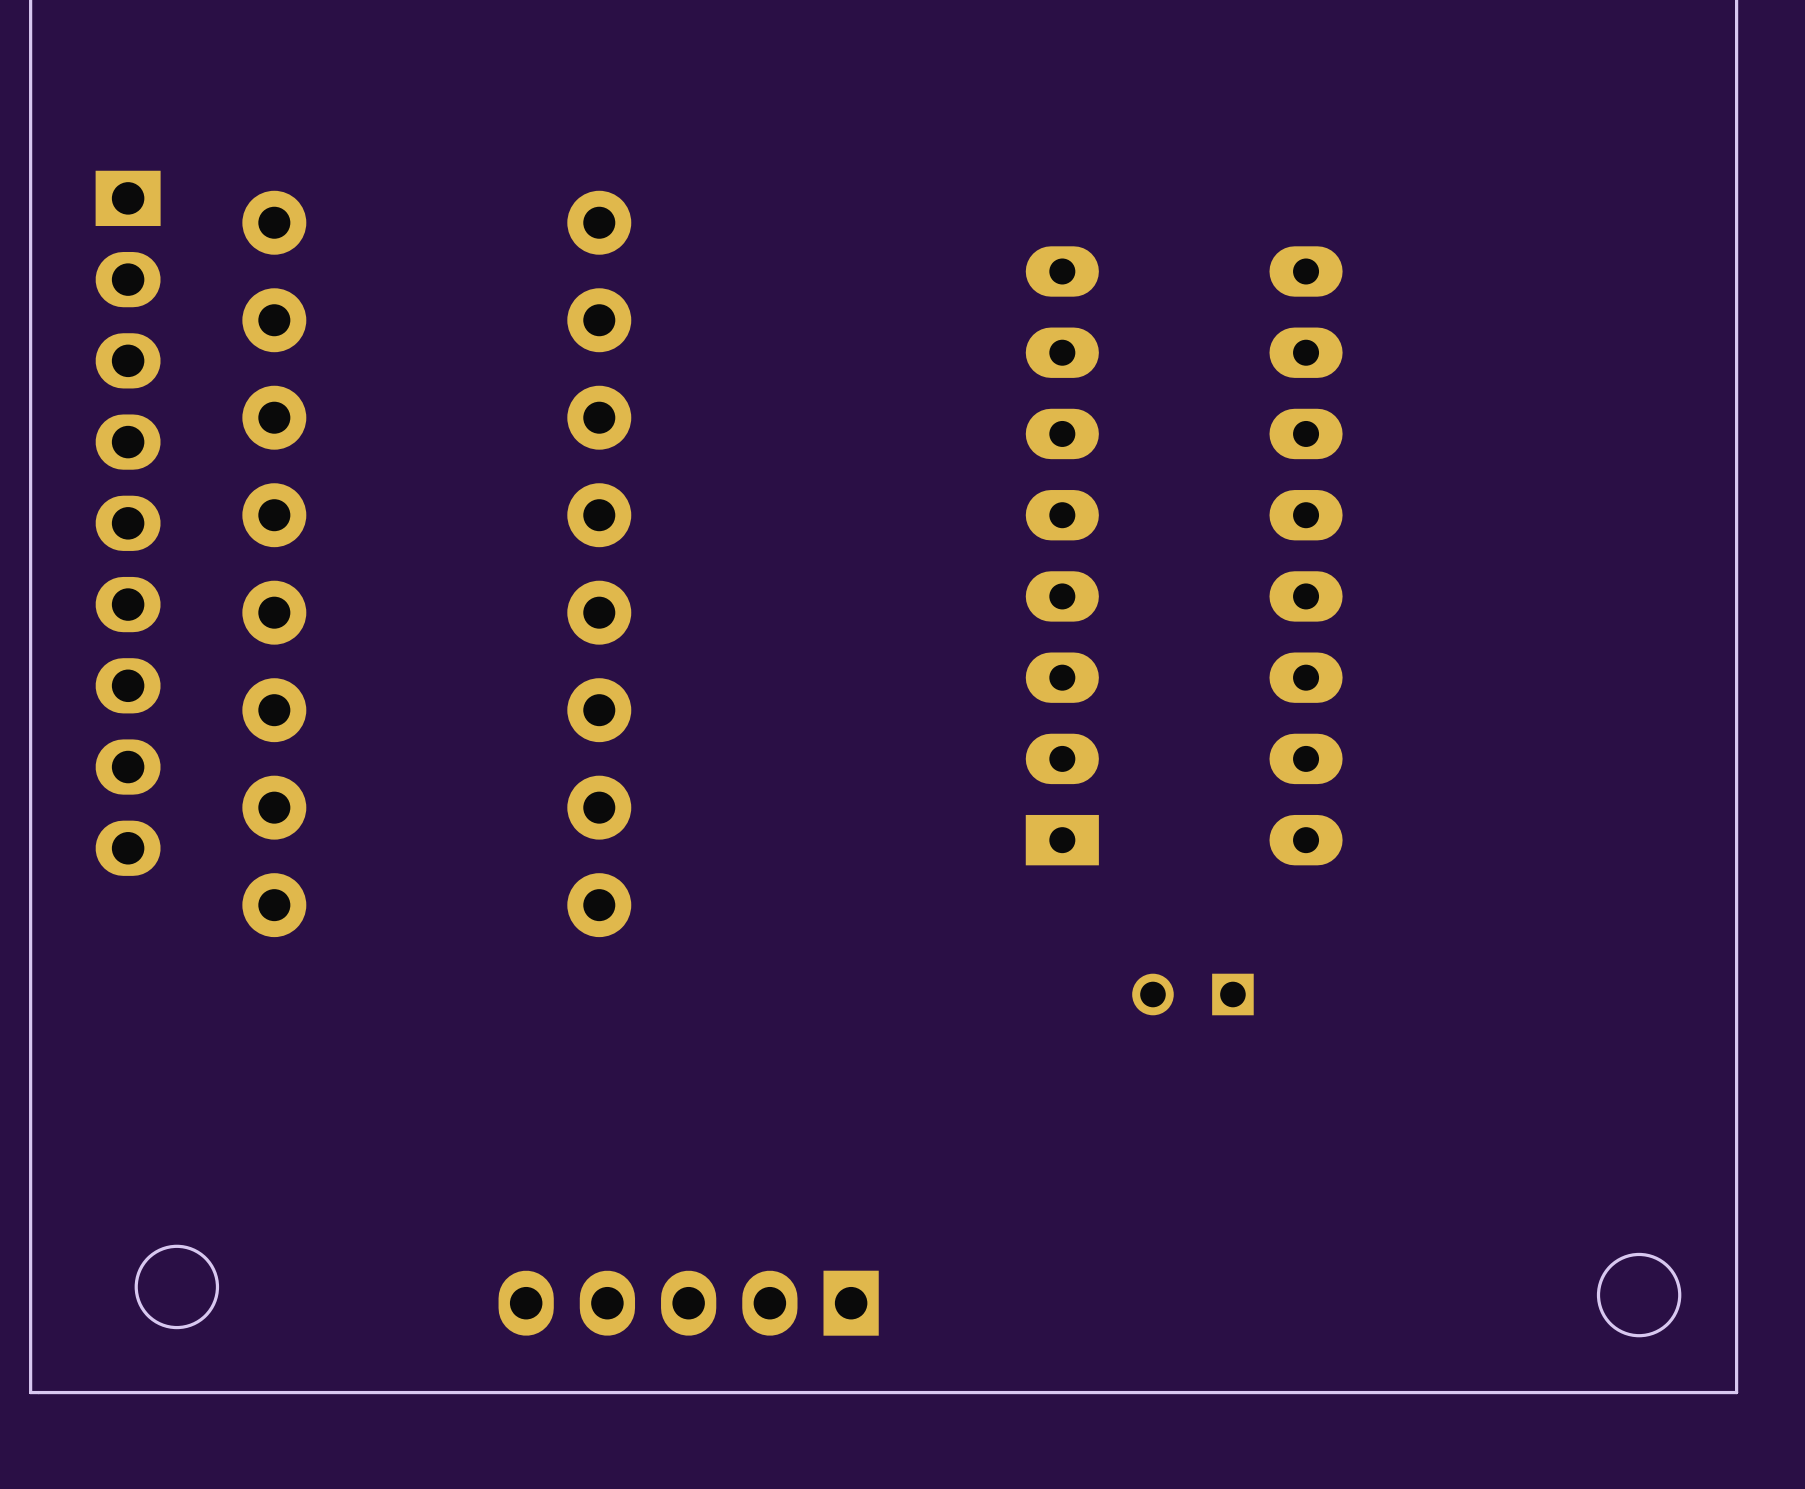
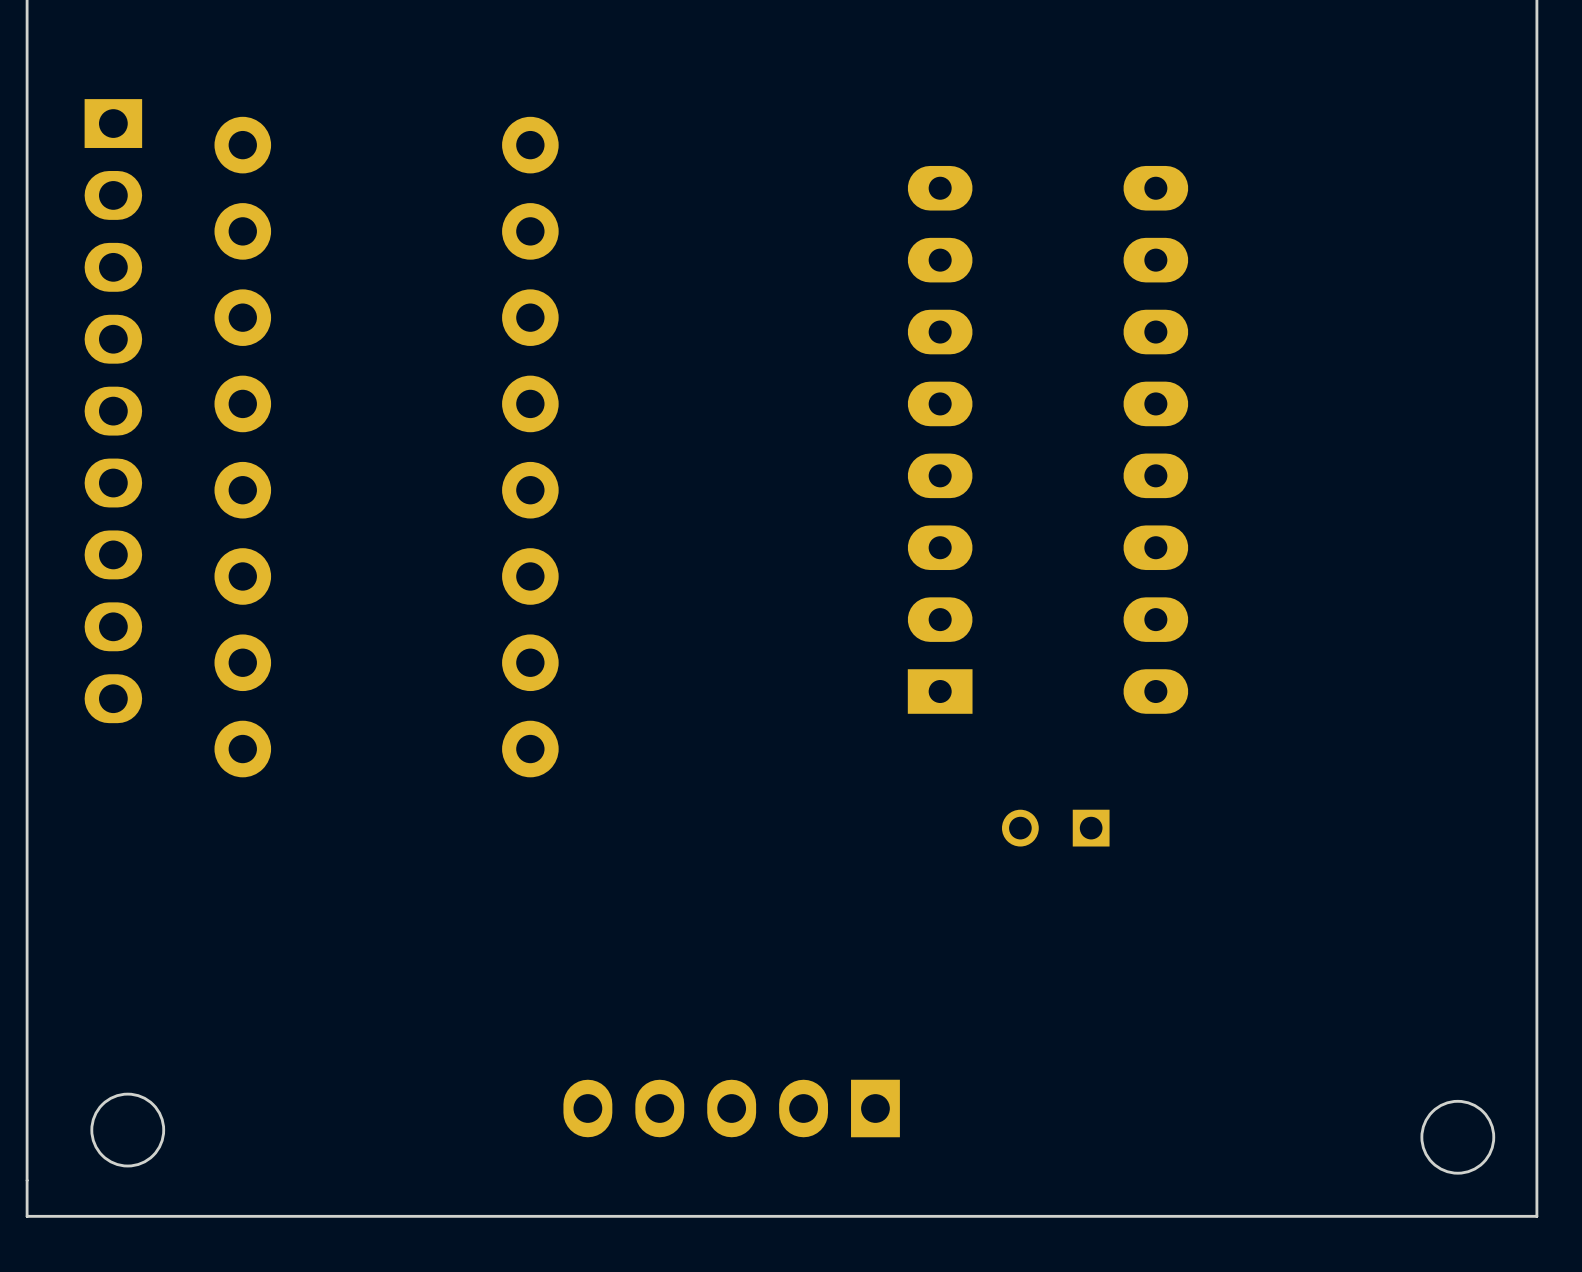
round board edge position: (176, 1286) -> (127, 1130)
round board edge position: (1639, 1295) -> (1457, 1137)
part position: (688, 1303) -> (731, 1108)
board edge: (1736, 1392) (30, 1392) -> (1536, 1180) (1536, 1216) (27, 1216) (27, 1180)

